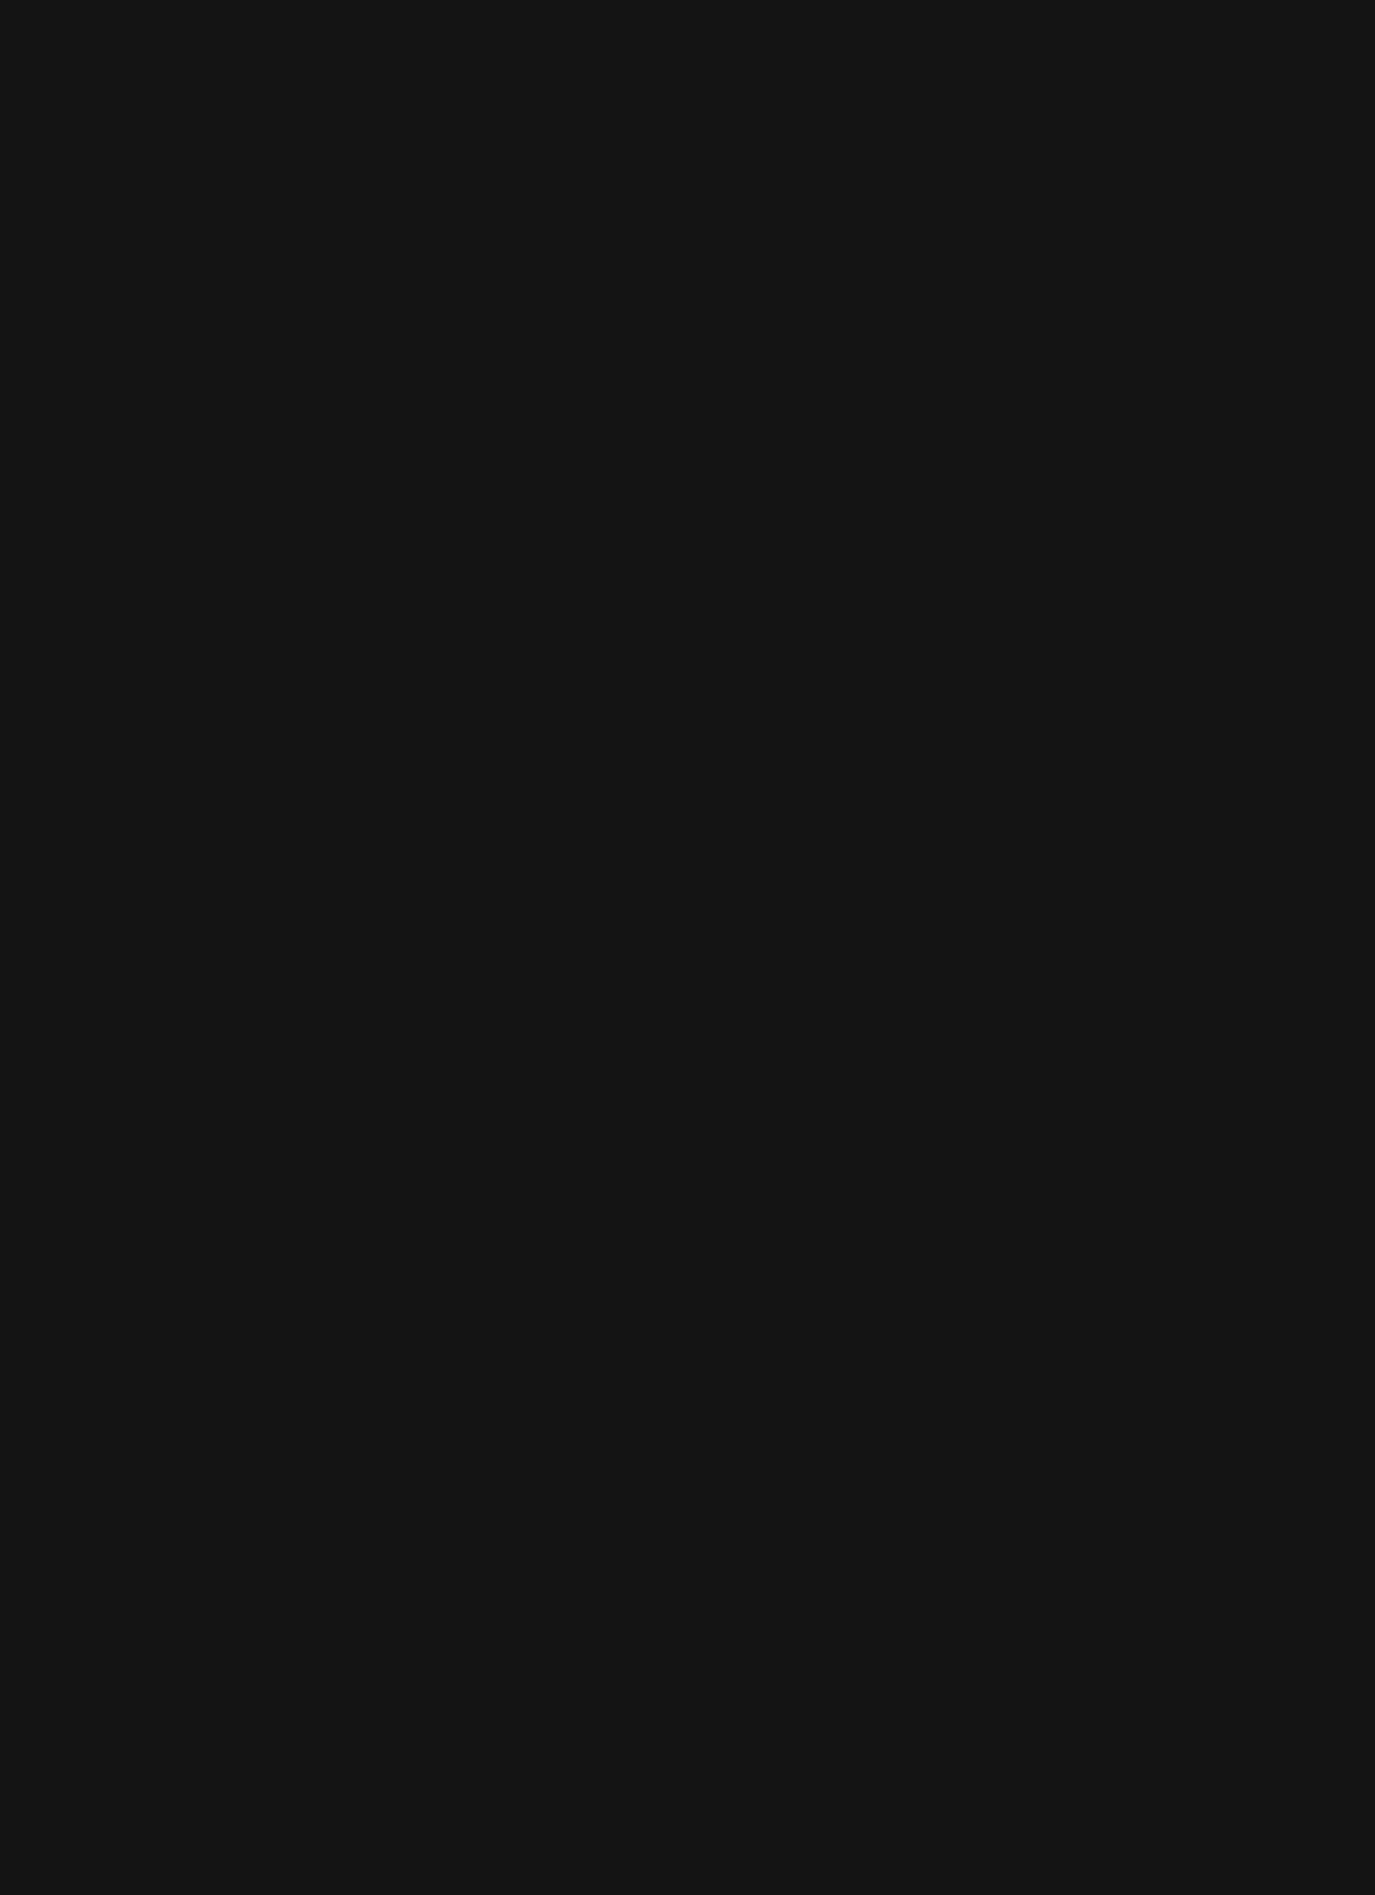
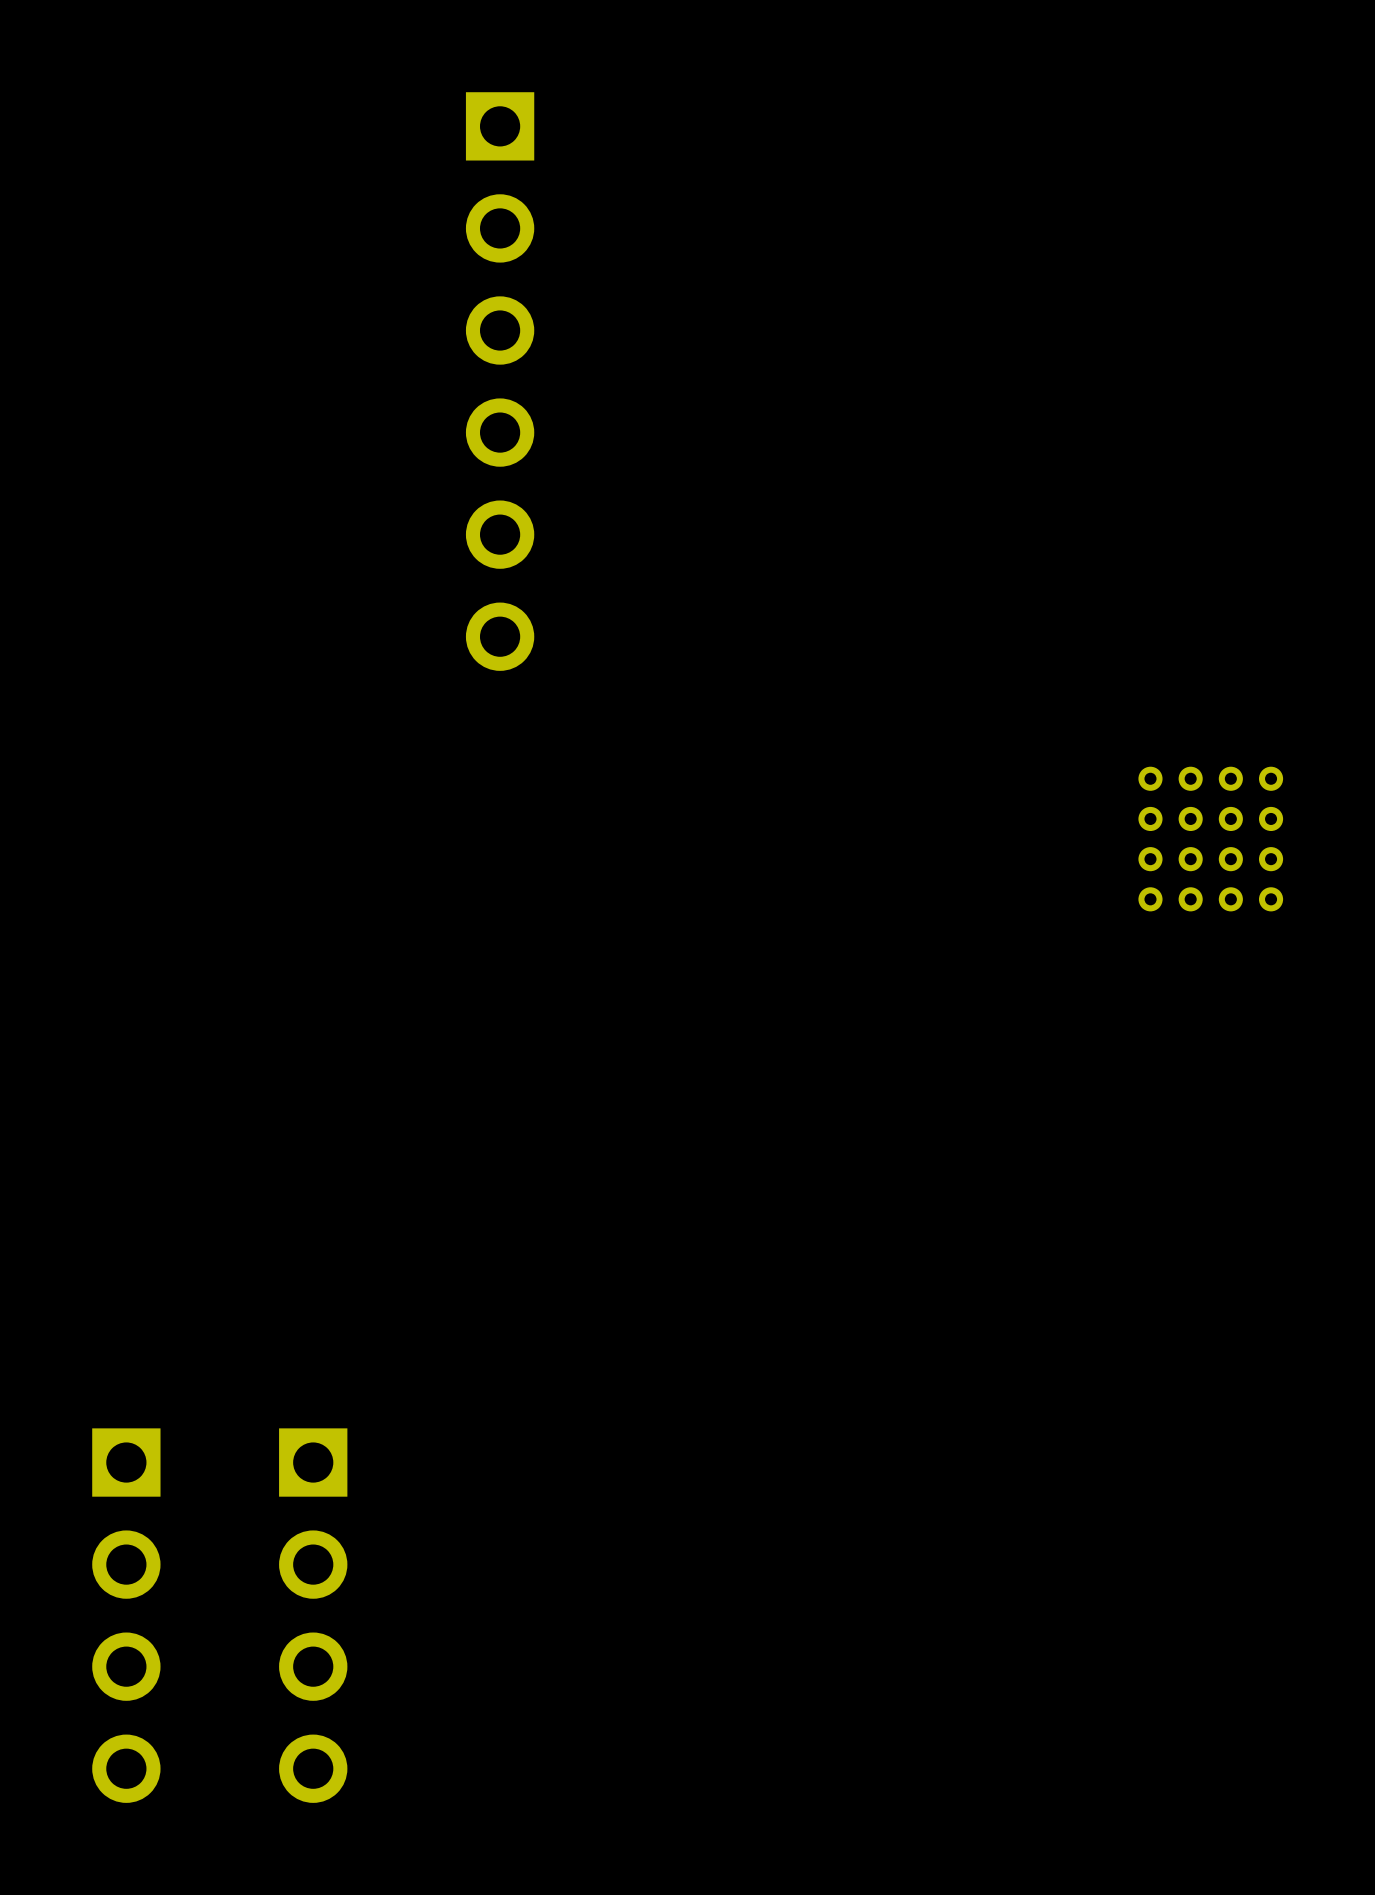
part: none -> (500, 381)
part: none -> (1210, 839)
part: none -> (126, 1615)
part: none -> (313, 1615)

